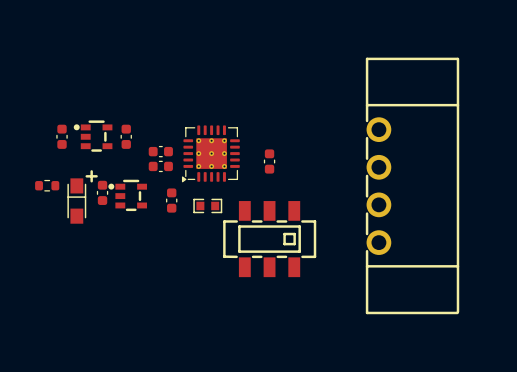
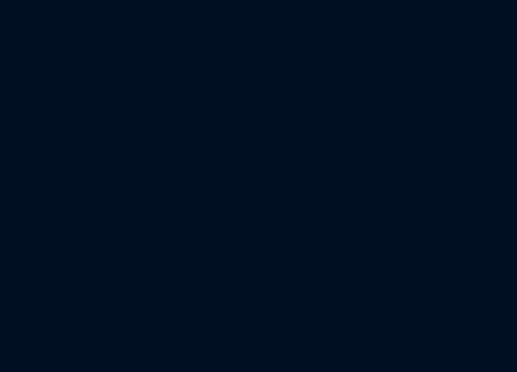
part: (62, 136) -> none
part: (93, 136) -> none
part: (126, 136) -> none
part: (160, 151) -> none
part: (210, 153) -> none
part: (269, 161) -> none
part: (160, 166) -> none
part: (47, 185) -> none
part: (412, 185) -> none
part: (102, 192) -> none
part: (127, 195) -> none
part: (82, 196) -> none
part: (171, 200) -> none
part: (207, 205) -> none
part: (269, 239) -> none

